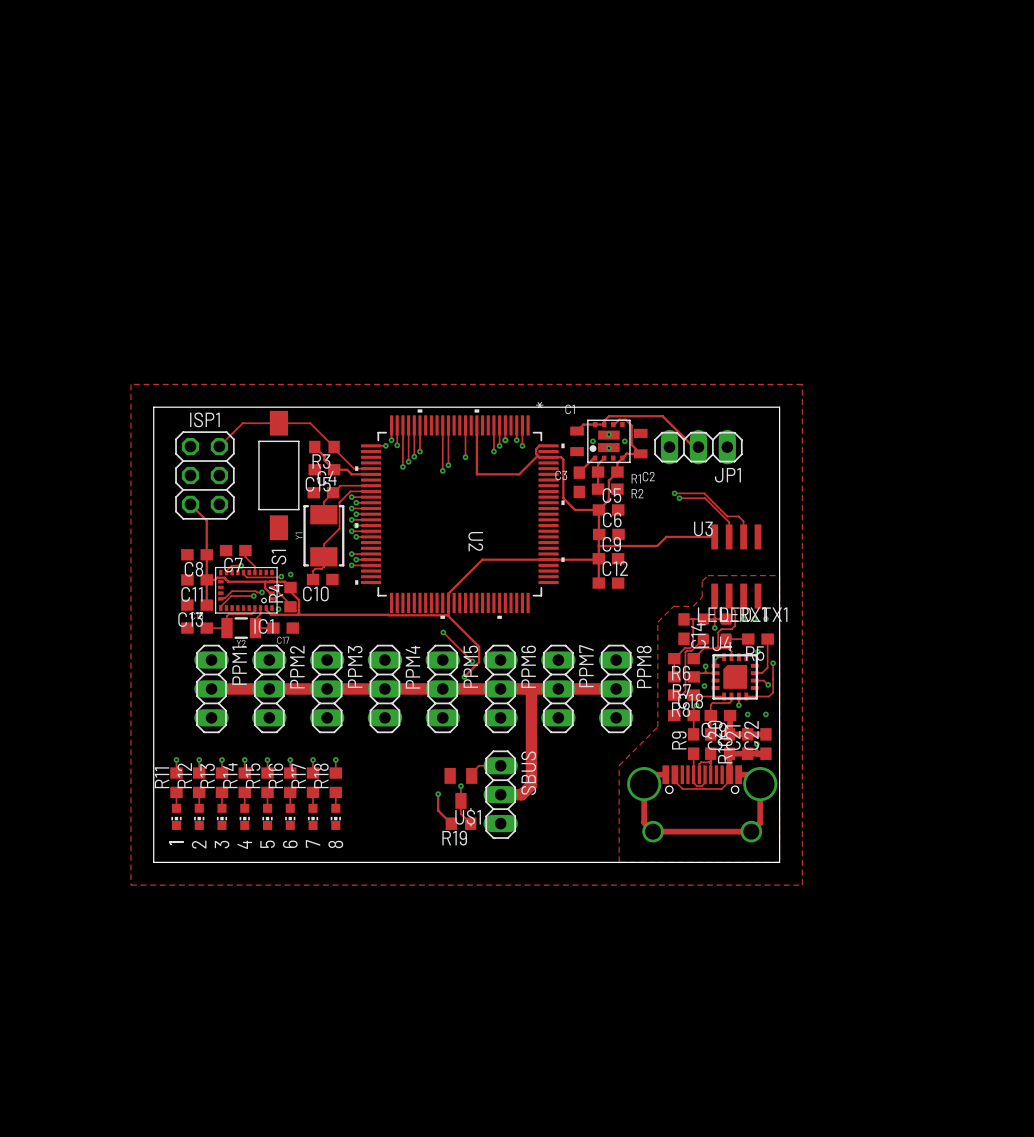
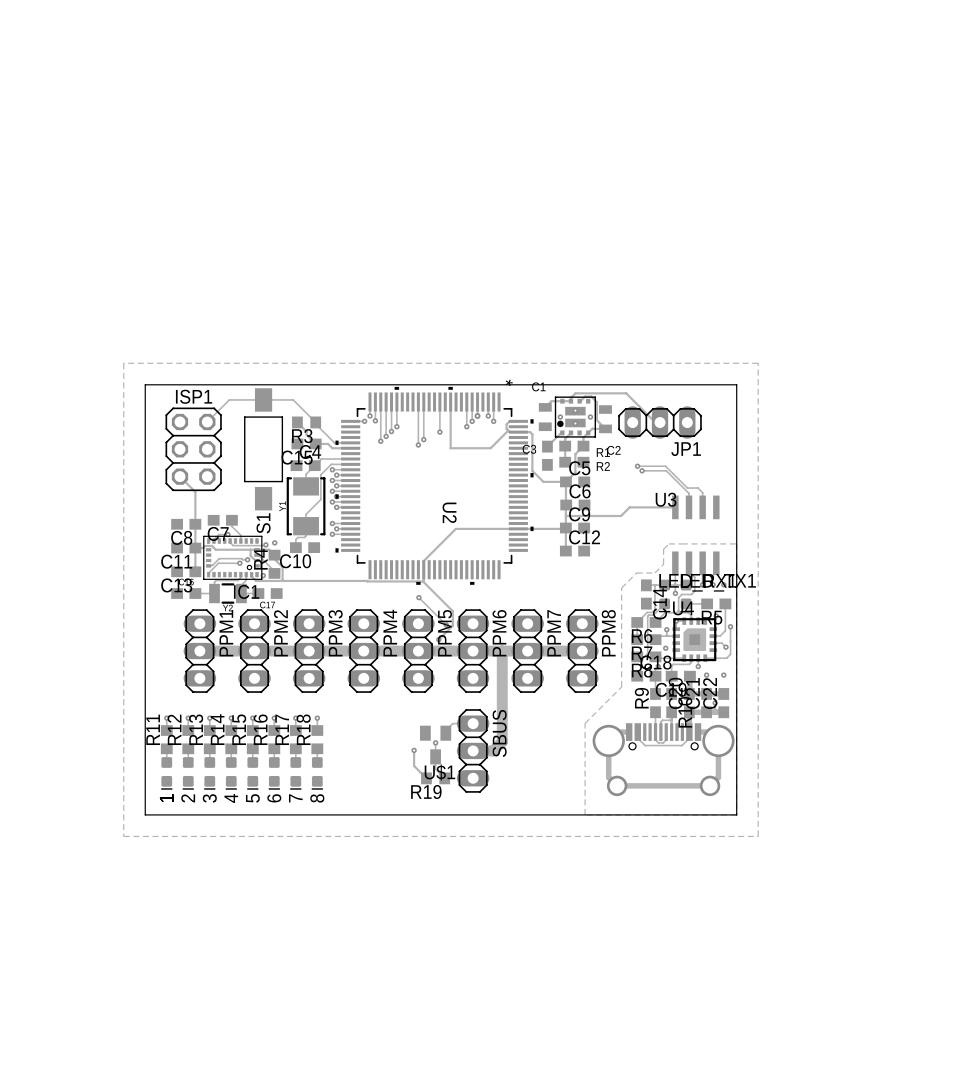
part footprint: [171, 803, 182, 830] -> [160, 757, 173, 790]
part footprint: [194, 803, 205, 830] -> [182, 757, 195, 790]
part footprint: [216, 803, 228, 830] -> [203, 757, 216, 790]
part footprint: [239, 803, 250, 830] -> [225, 757, 238, 790]
part footprint: [262, 803, 273, 830] -> [246, 757, 259, 790]
part footprint: [285, 803, 296, 830] -> [268, 757, 281, 790]
part footprint: [307, 803, 319, 830] -> [290, 757, 302, 790]
part footprint: [330, 803, 341, 830] -> [311, 757, 324, 790]

